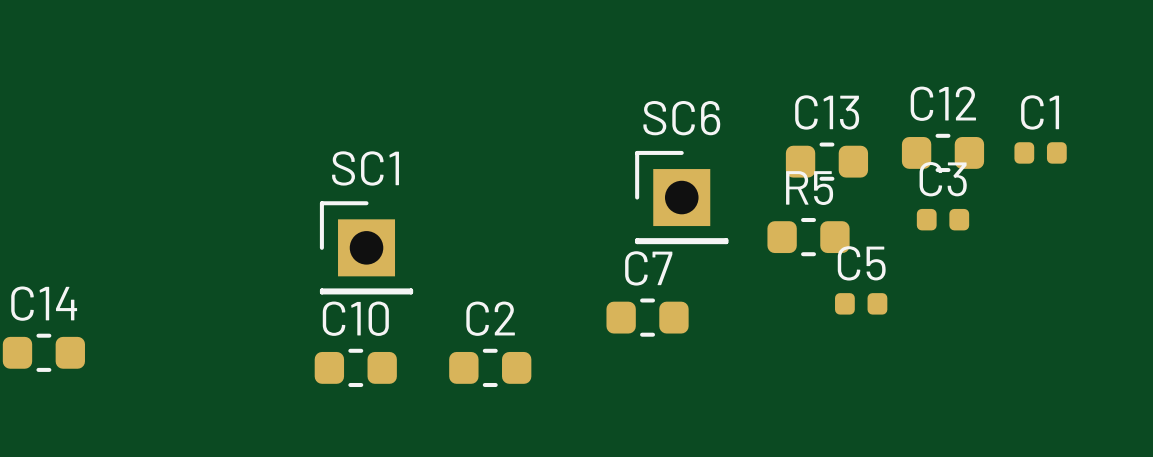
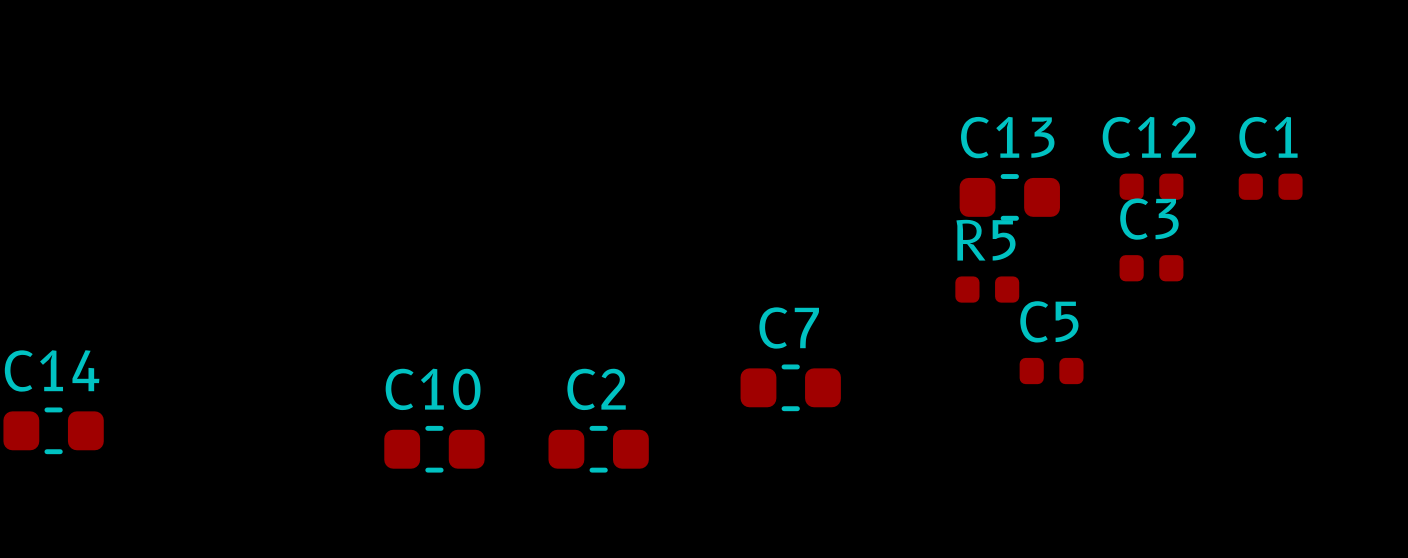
C12 footprint: [901, 133, 985, 173] -> [1119, 173, 1184, 200]
SC6: (681, 197) -> none
R5 footprint: [767, 217, 850, 257] -> [955, 276, 1020, 303]
SC1: (366, 247) -> none

